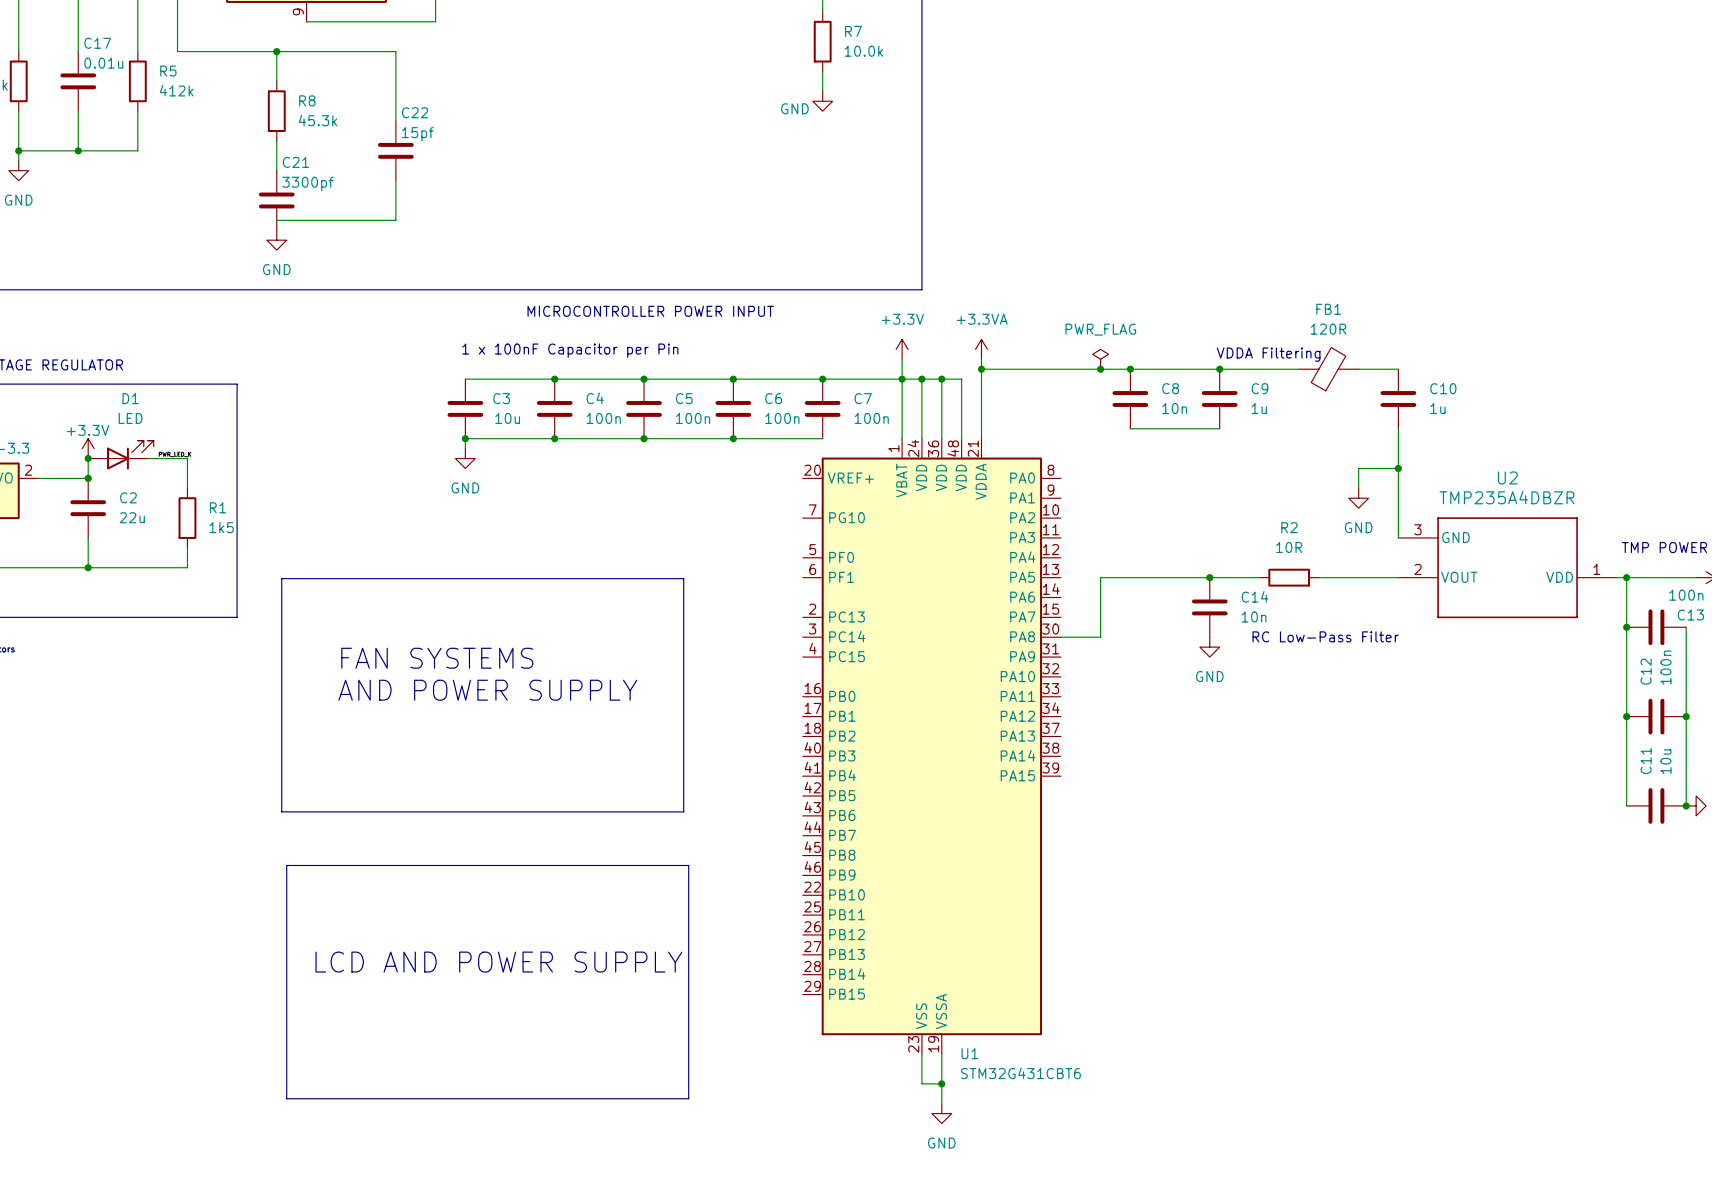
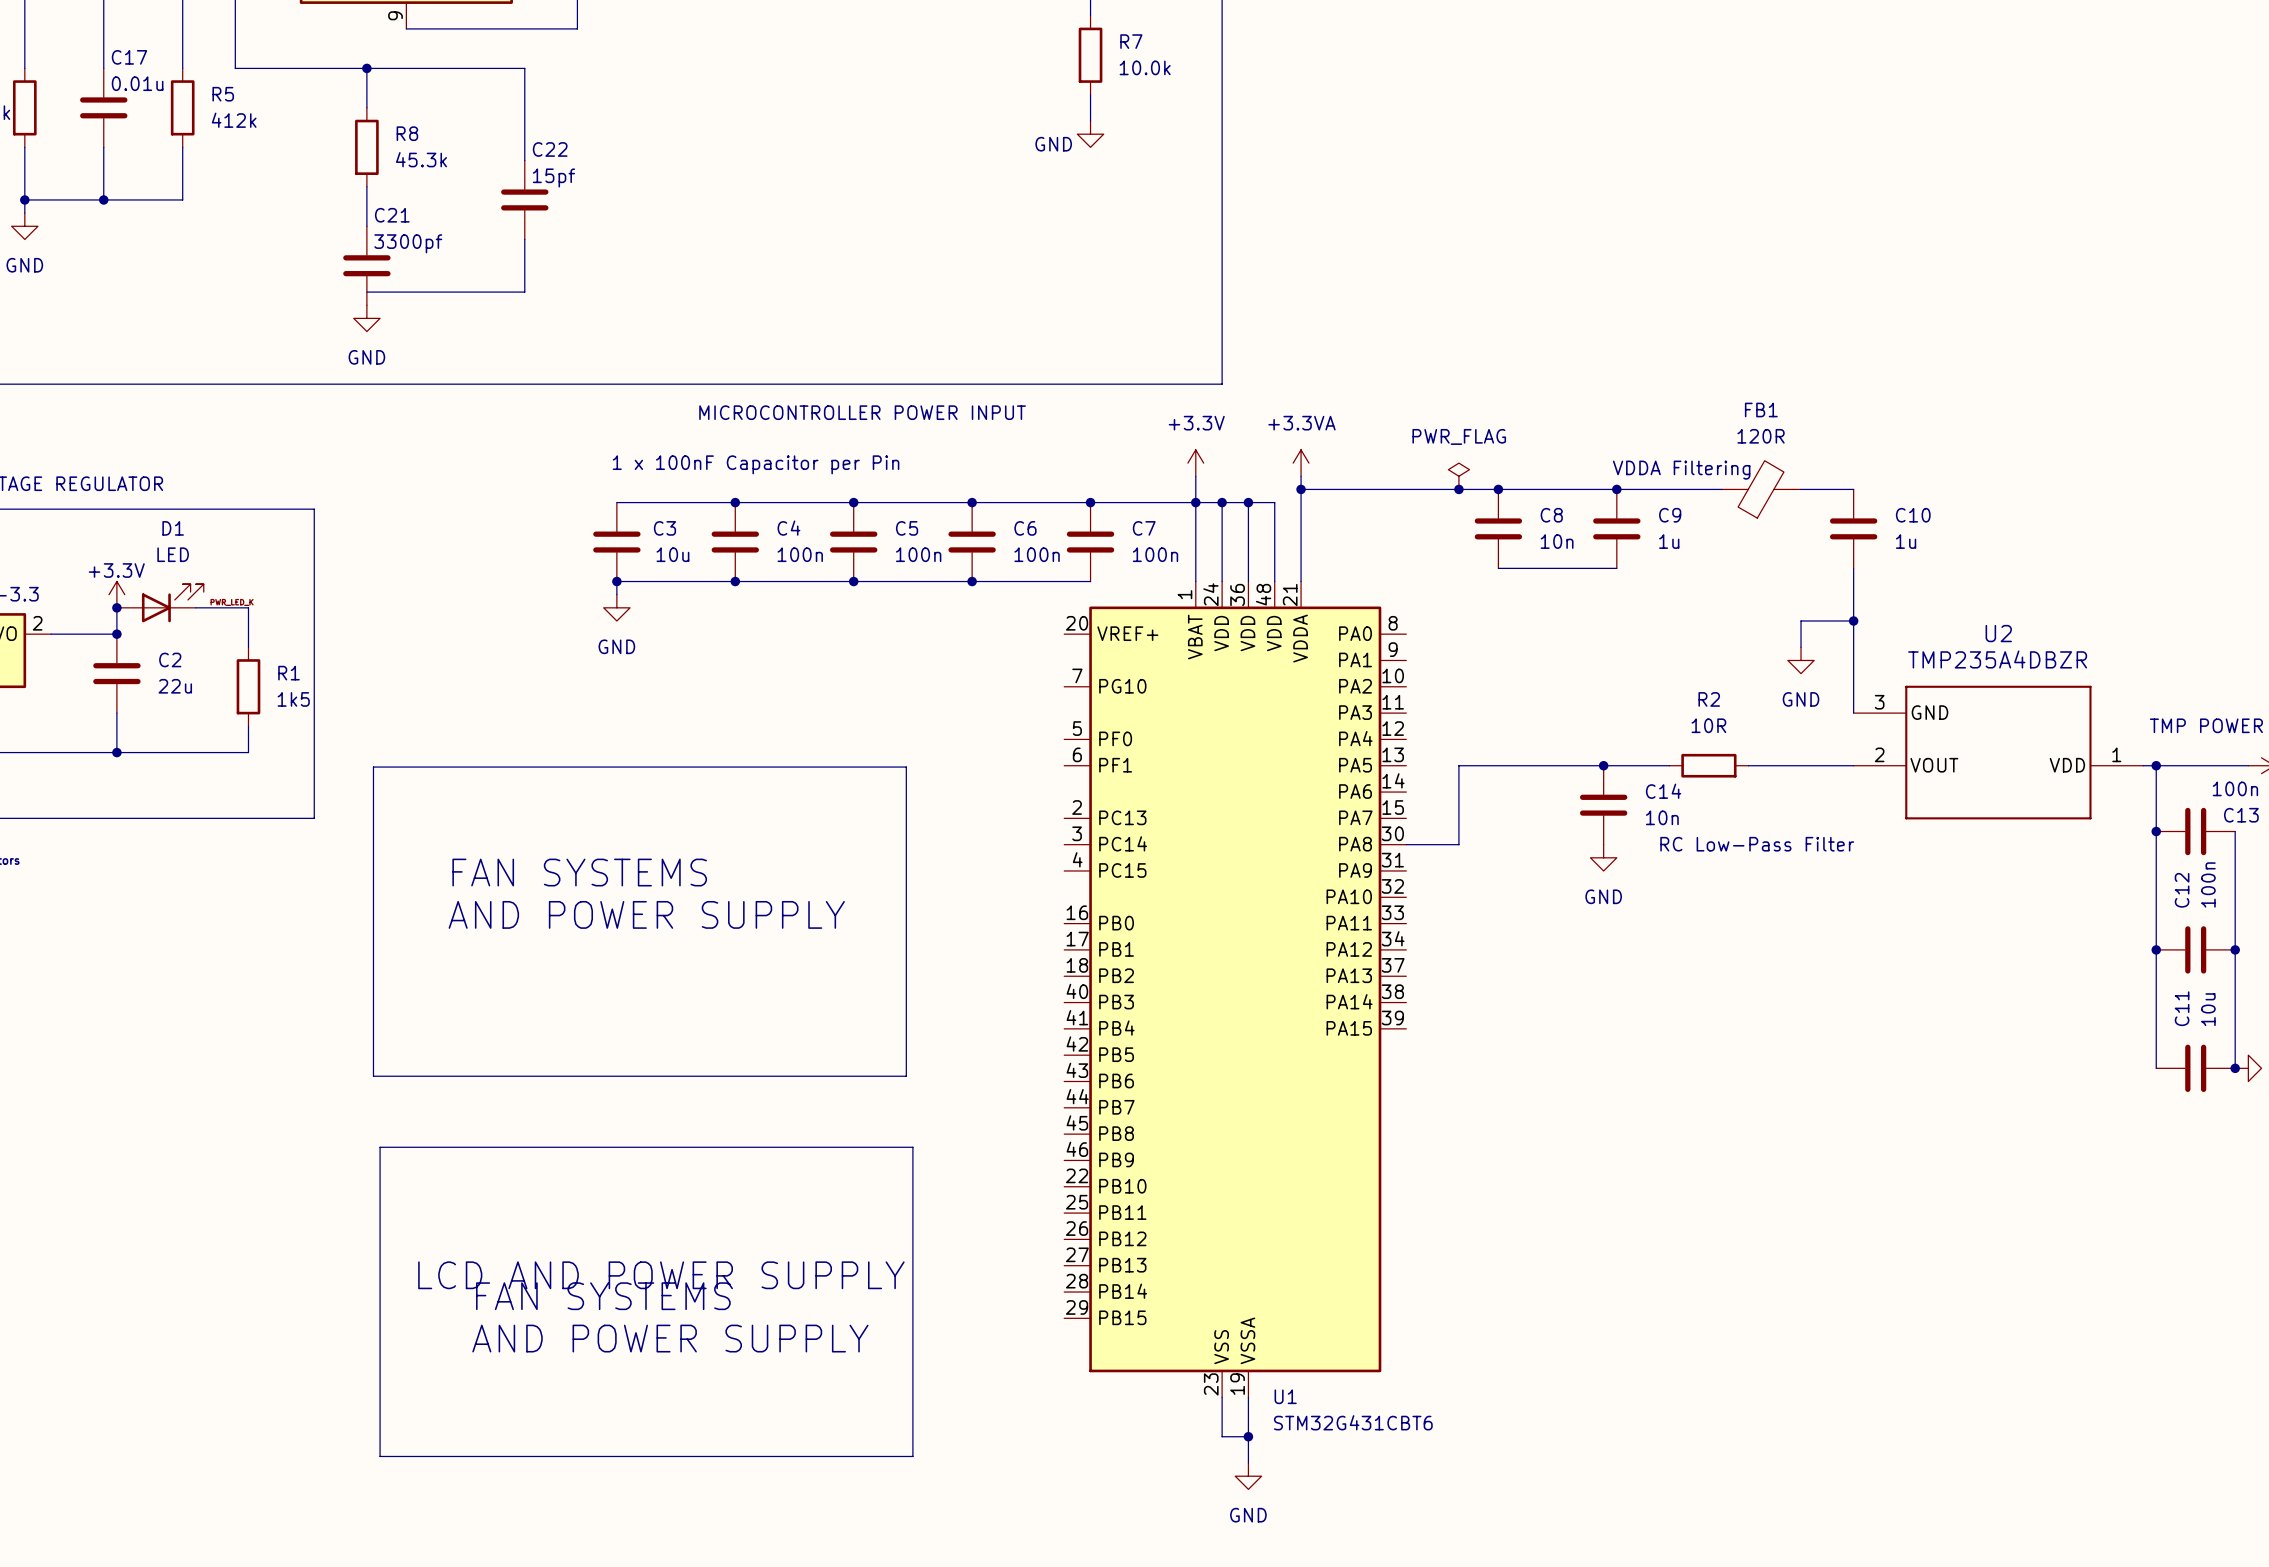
text: none -> FAN SYSTEMS (603, 1296)
text: none -> AND POWER SUPPLY (670, 1338)

